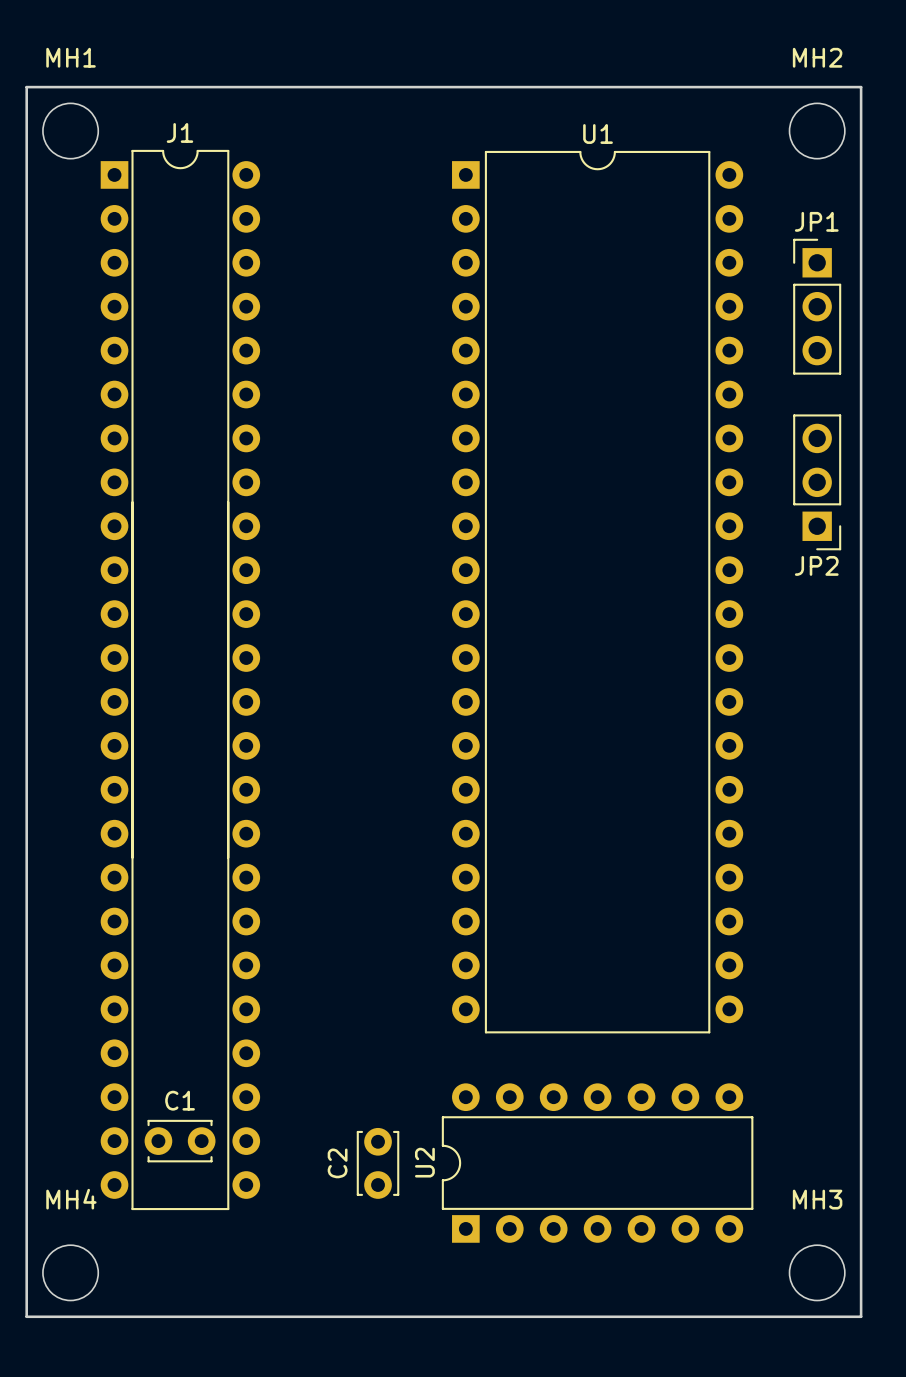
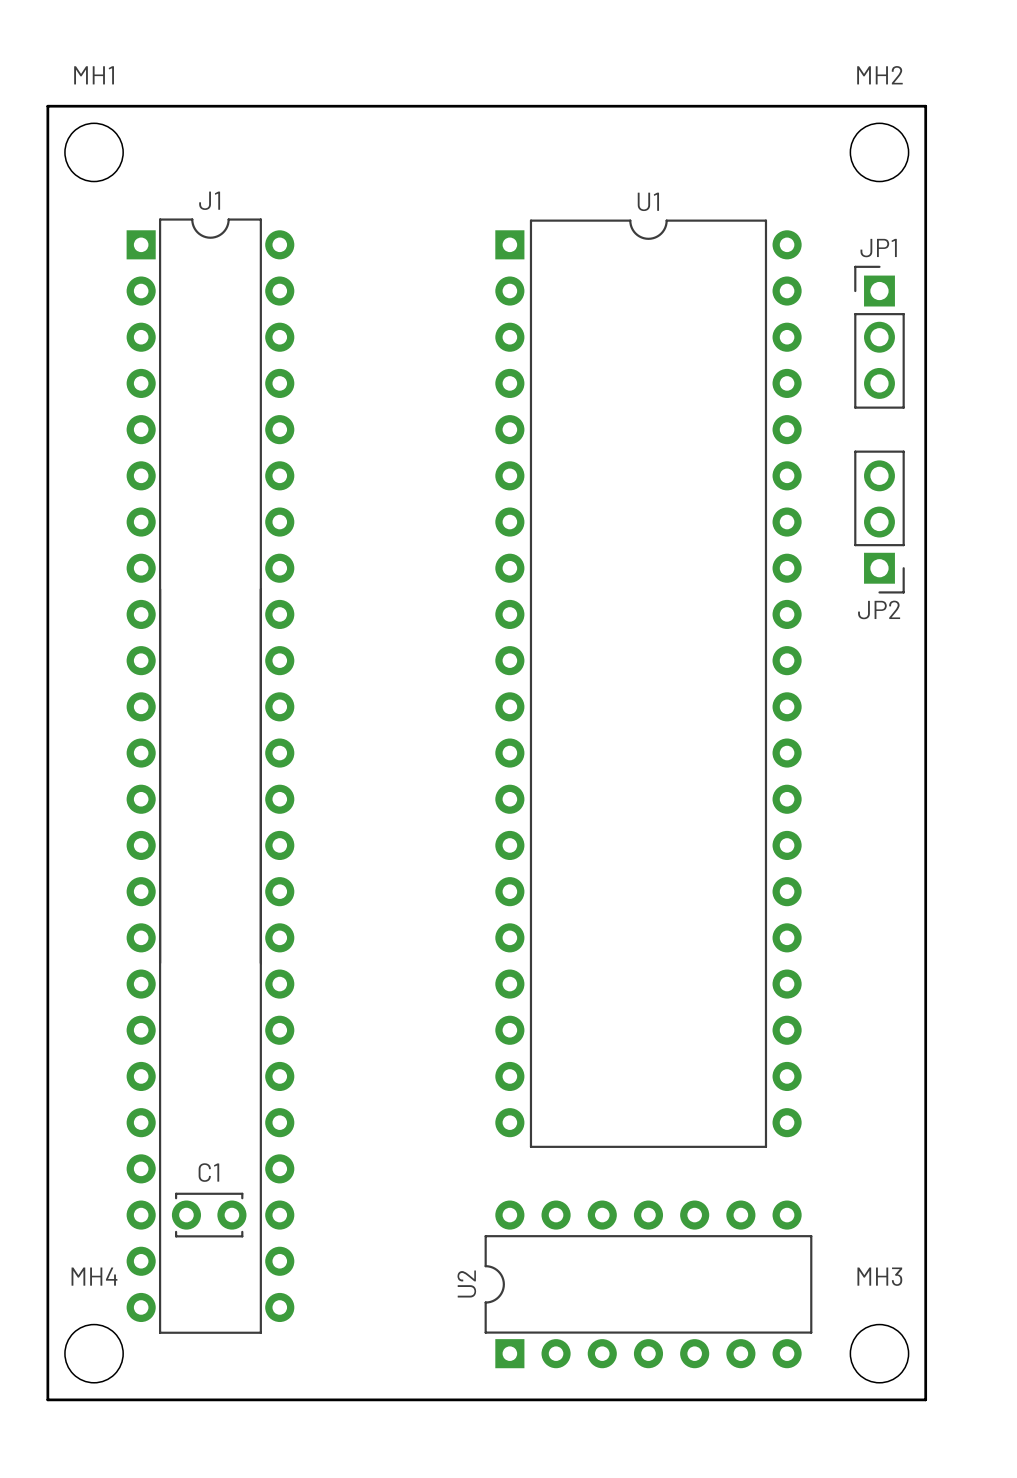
U1 position: (597, 592) -> (648, 683)
J1 position: (180, 679) -> (210, 776)
C2: (378, 1163) -> none
U2 position: (597, 1163) -> (648, 1284)

